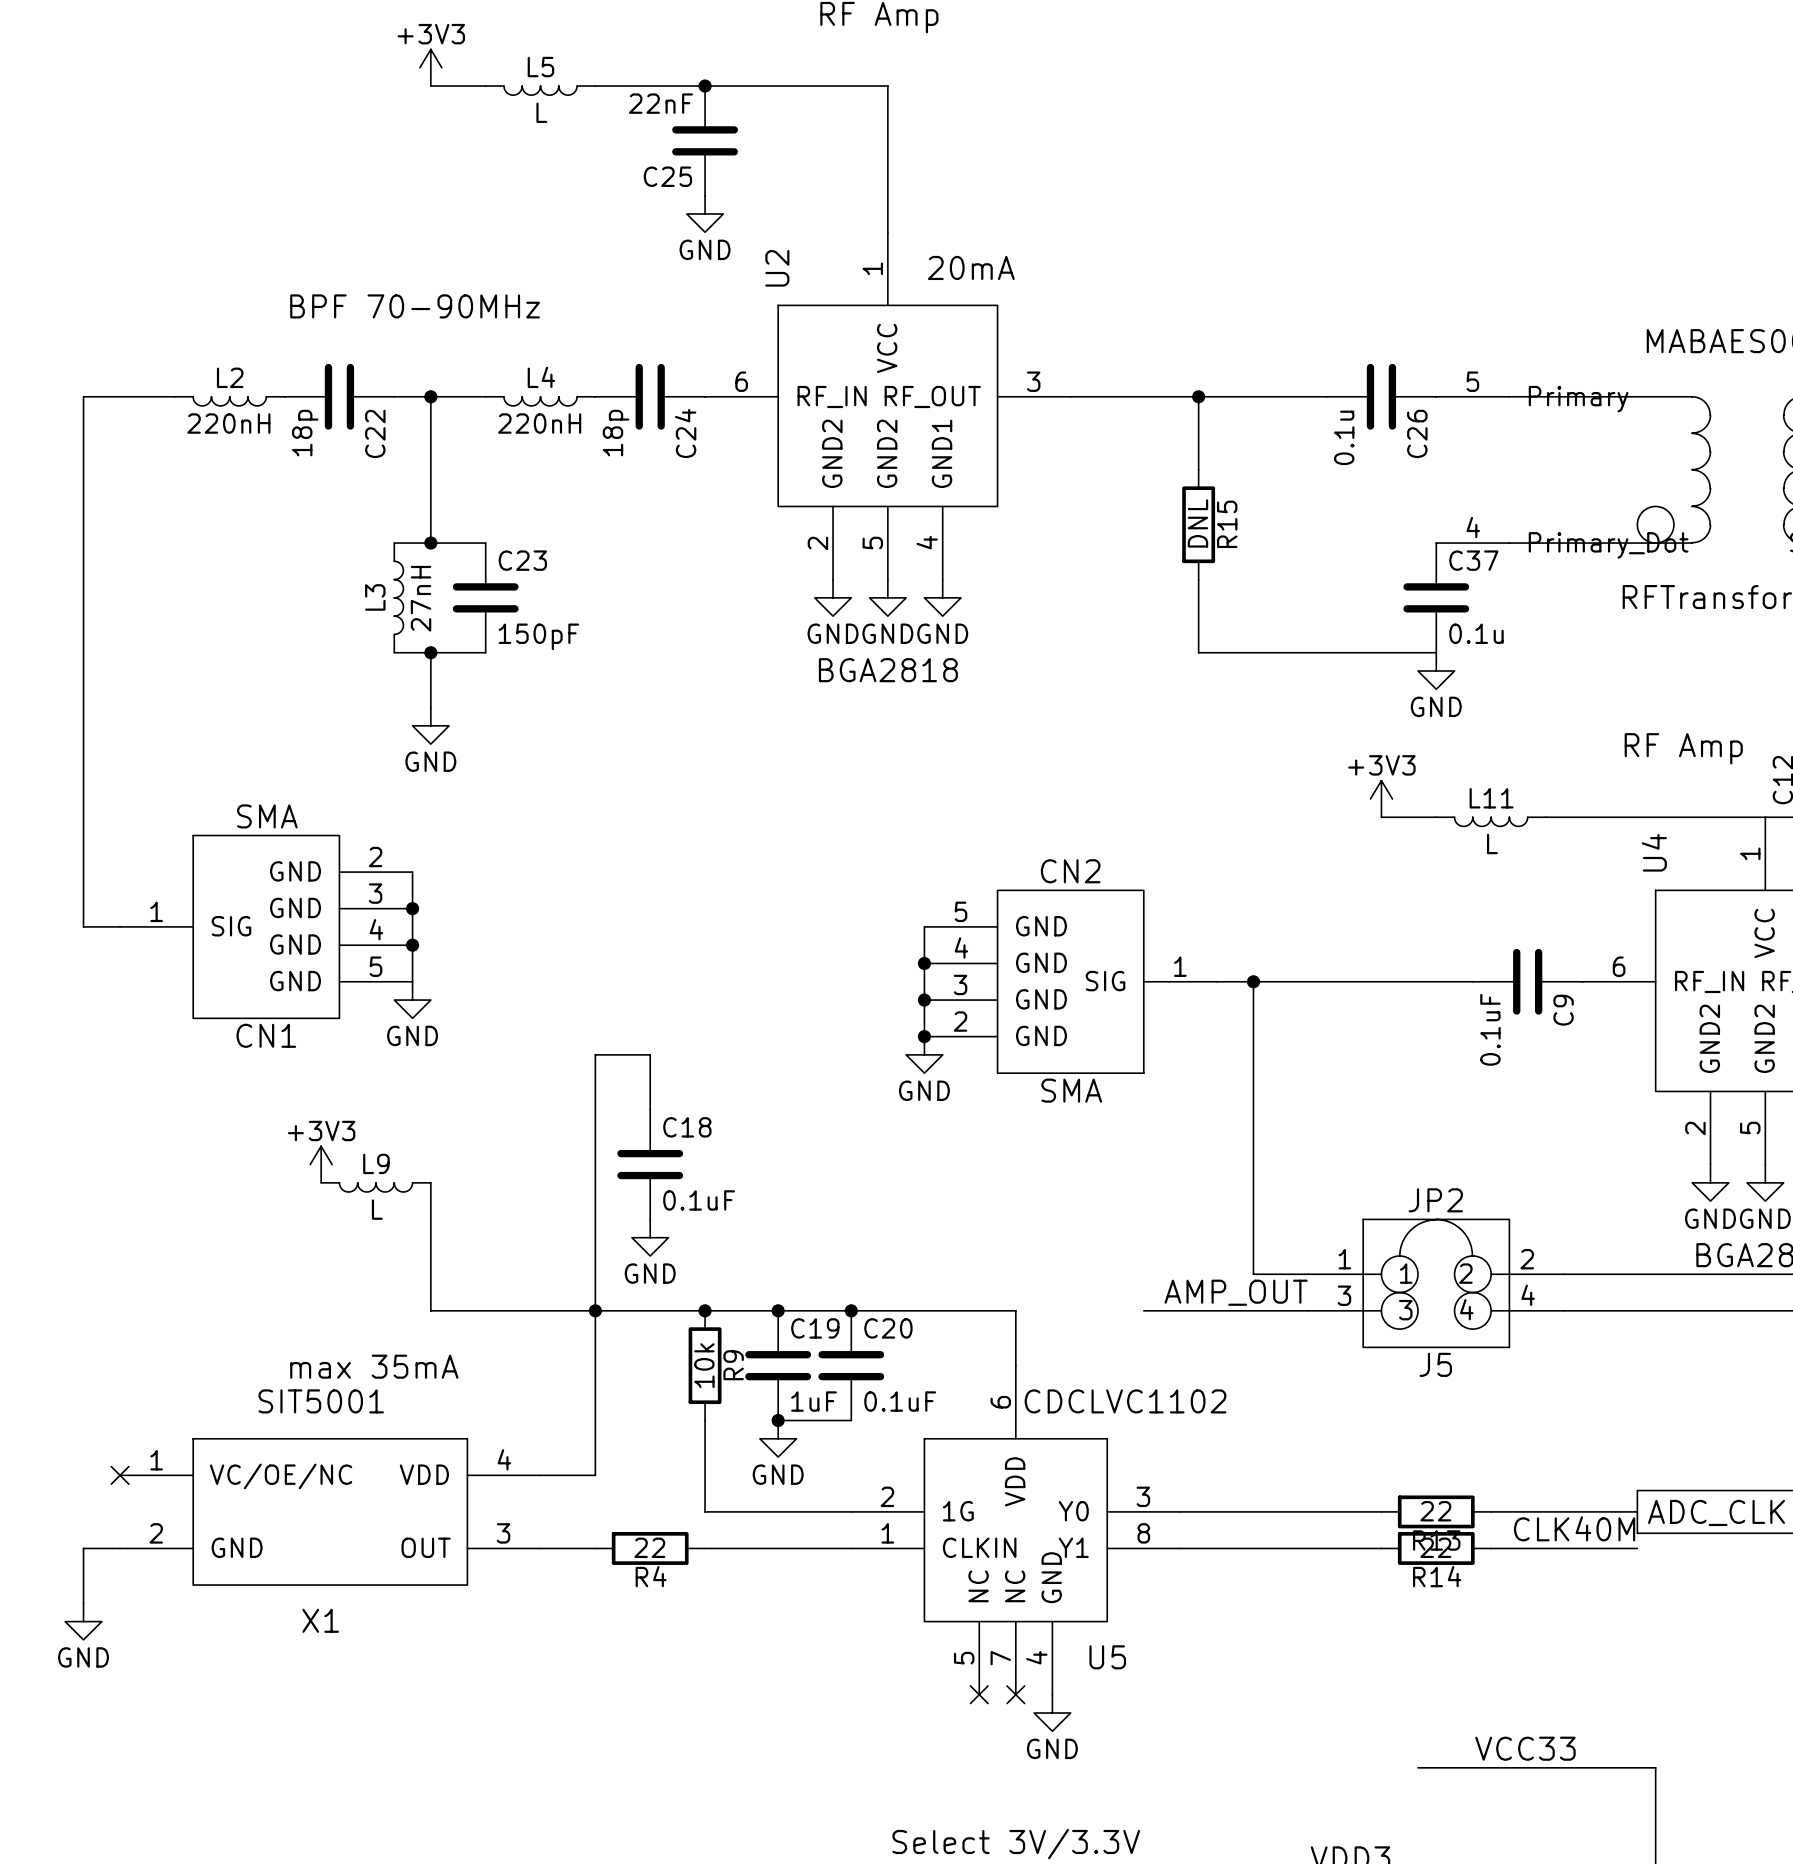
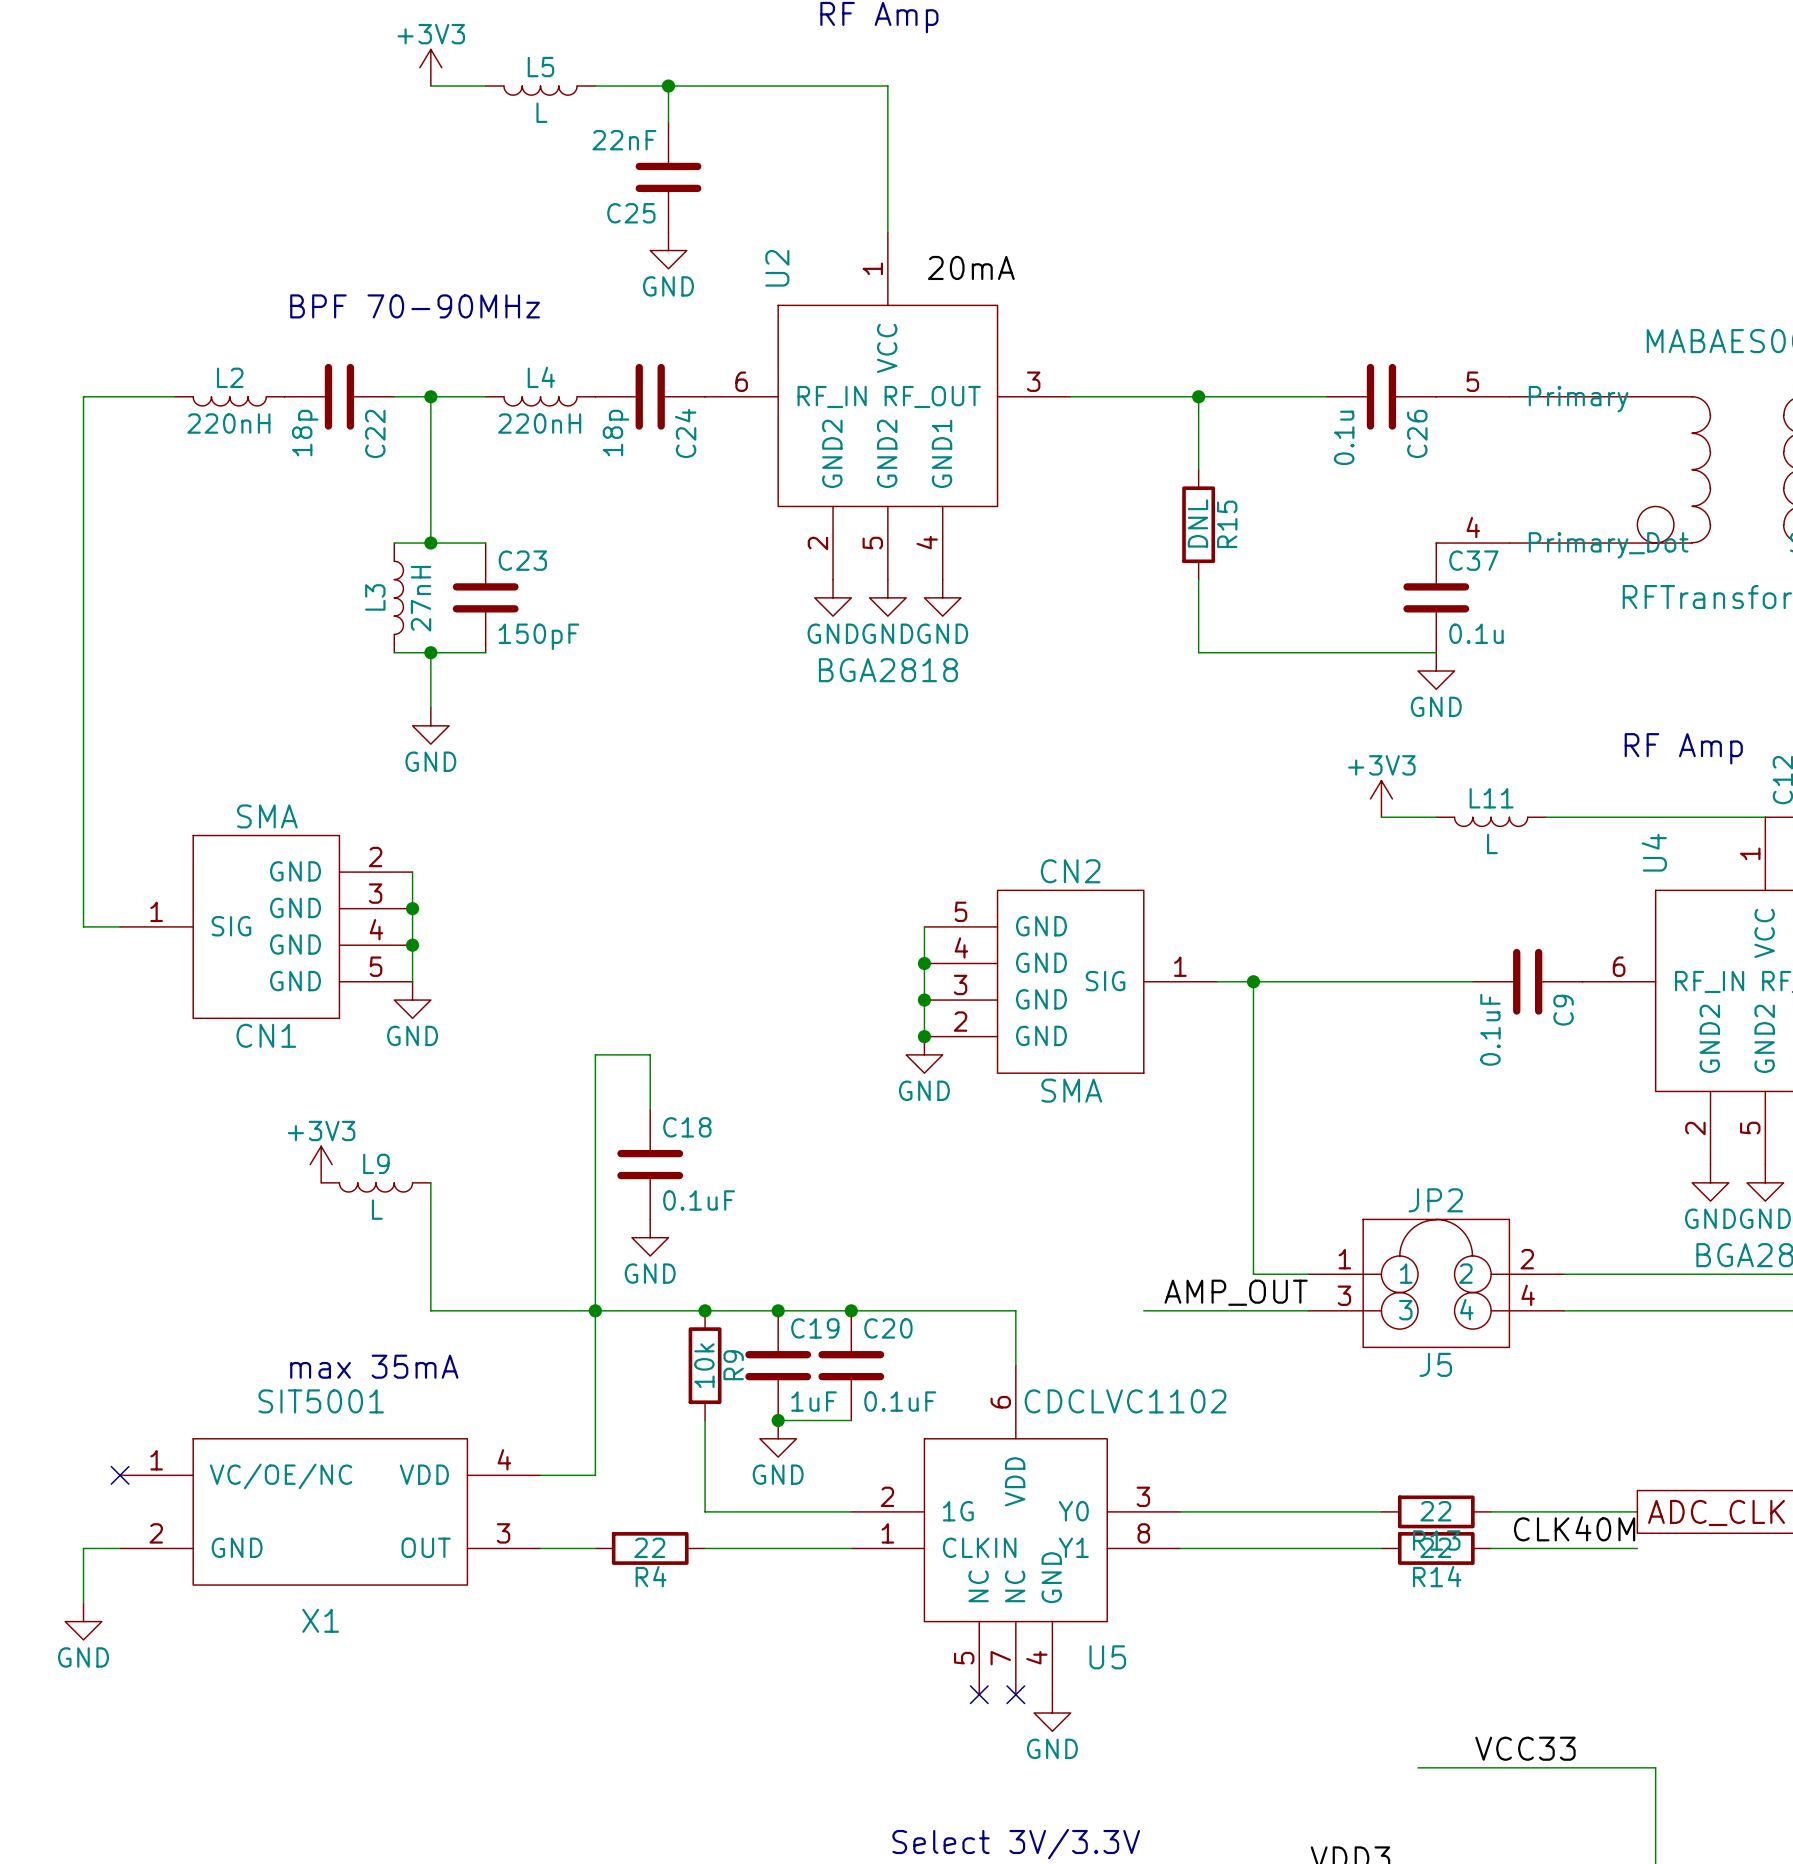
wire: none -> (668, 86) (668, 122)
junction position: (705, 86) -> (668, 86)
C25 position: (705, 140) -> (668, 177)
power symbol position: GND (705, 213) -> GND (668, 250)

